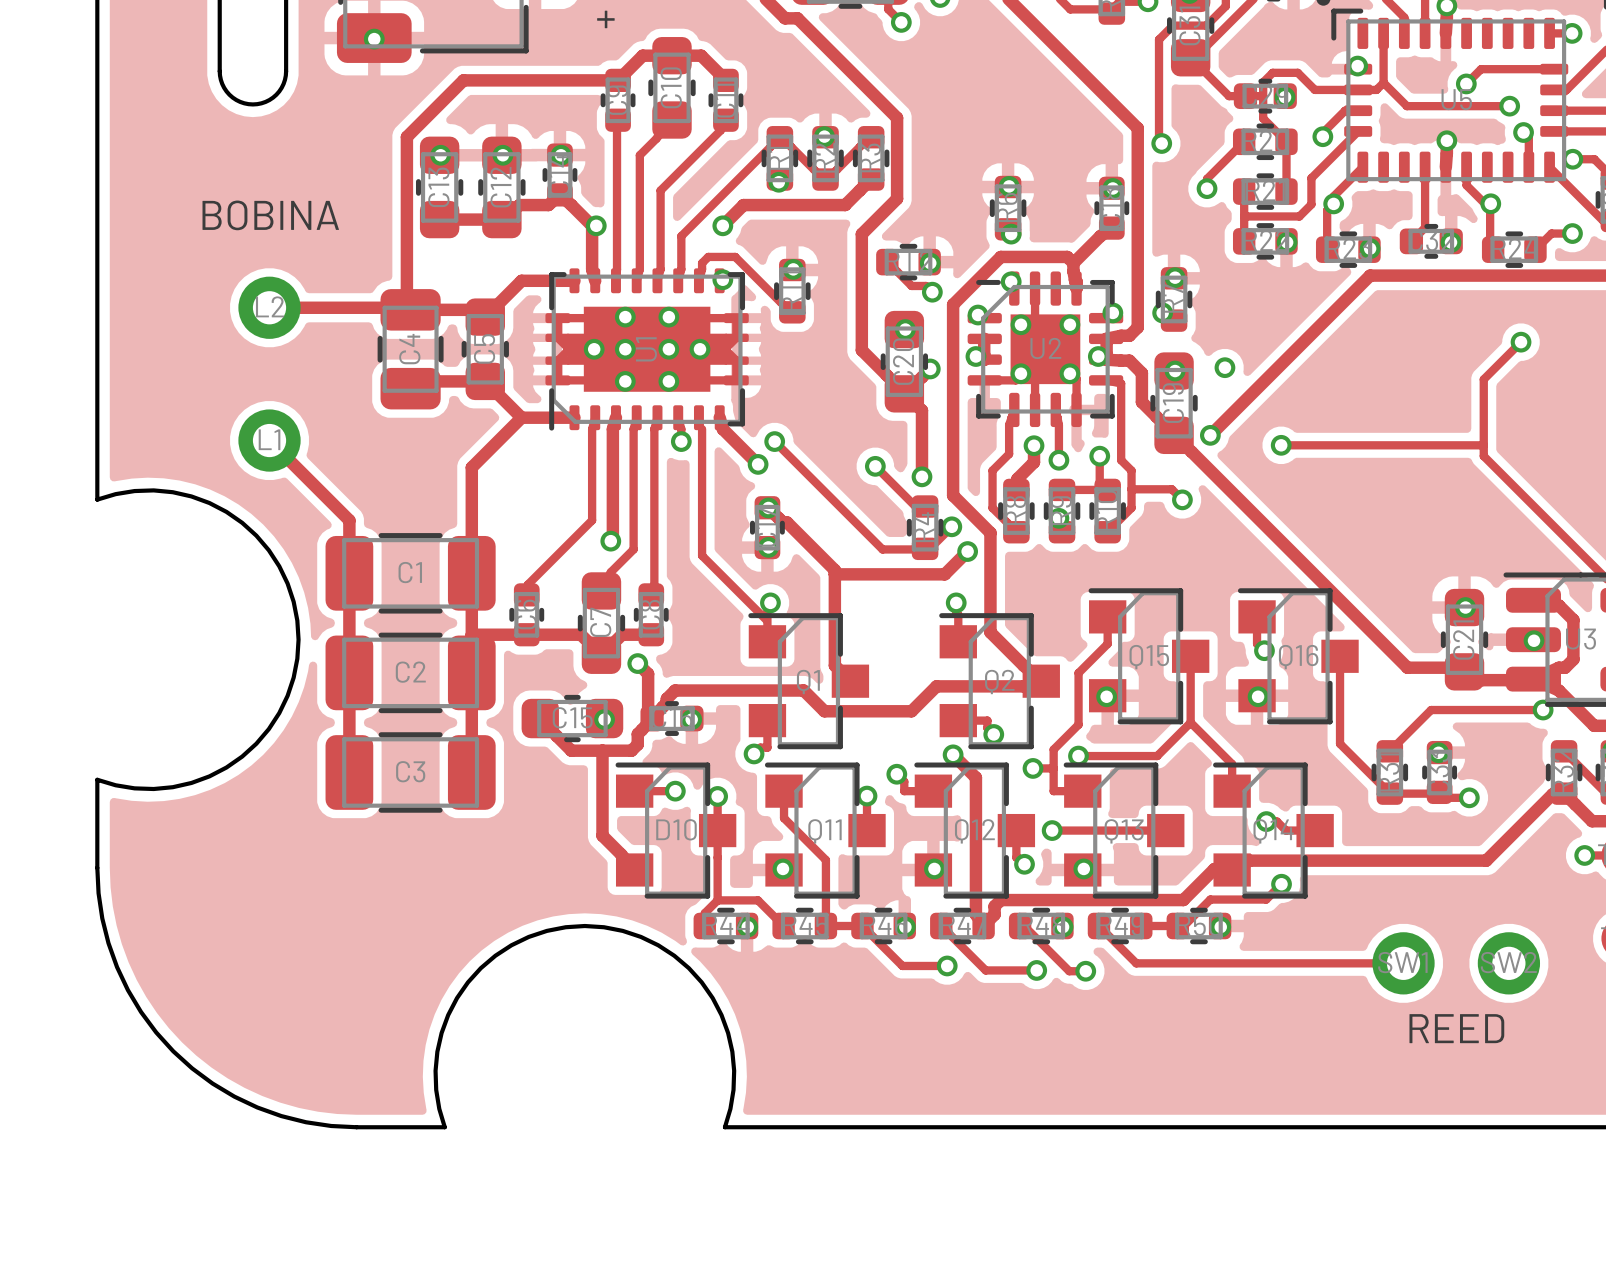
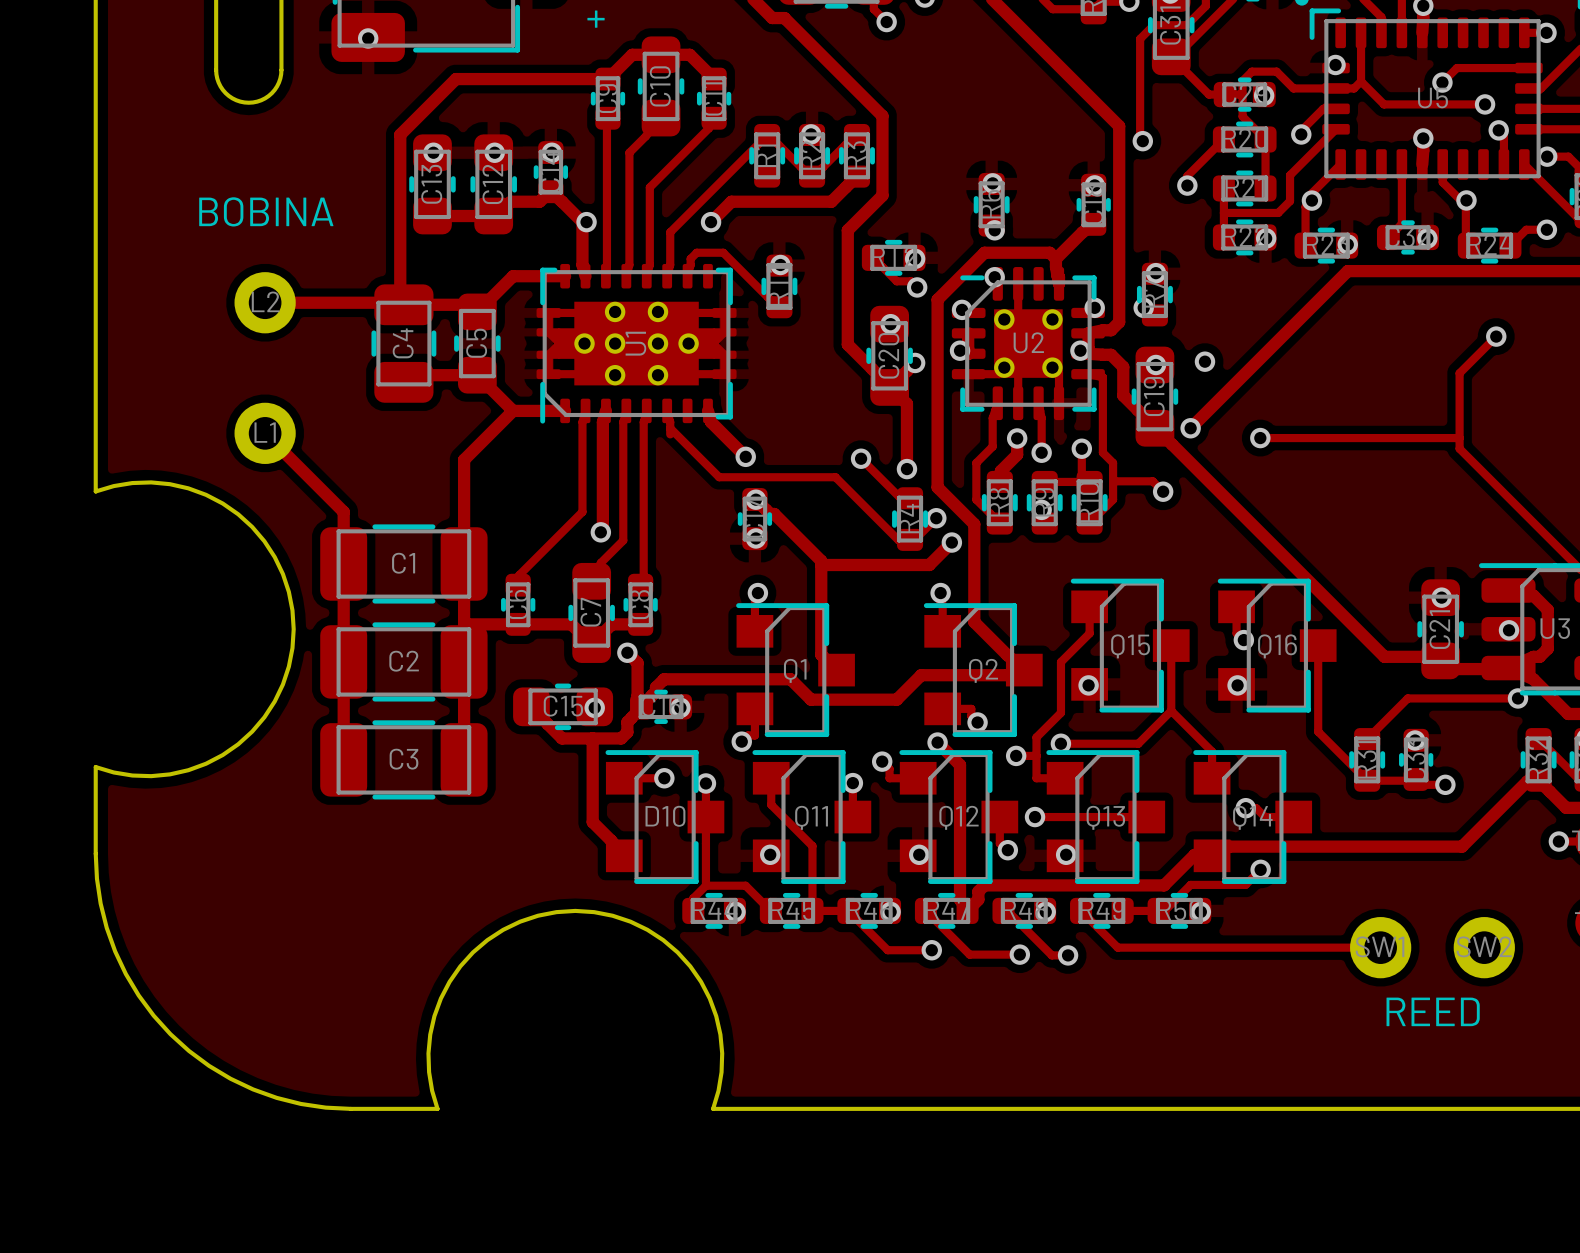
via: (778, 182) -> none
via: (722, 279) -> none
track: (702, 429) (702, 555) (766, 619) -> none
track: none -> (670, 428) (719, 477) (835, 477) (898, 540)
via: (681, 441) -> none
track: (774, 441) (882, 549) (911, 549) -> none
via: (774, 441) -> none

